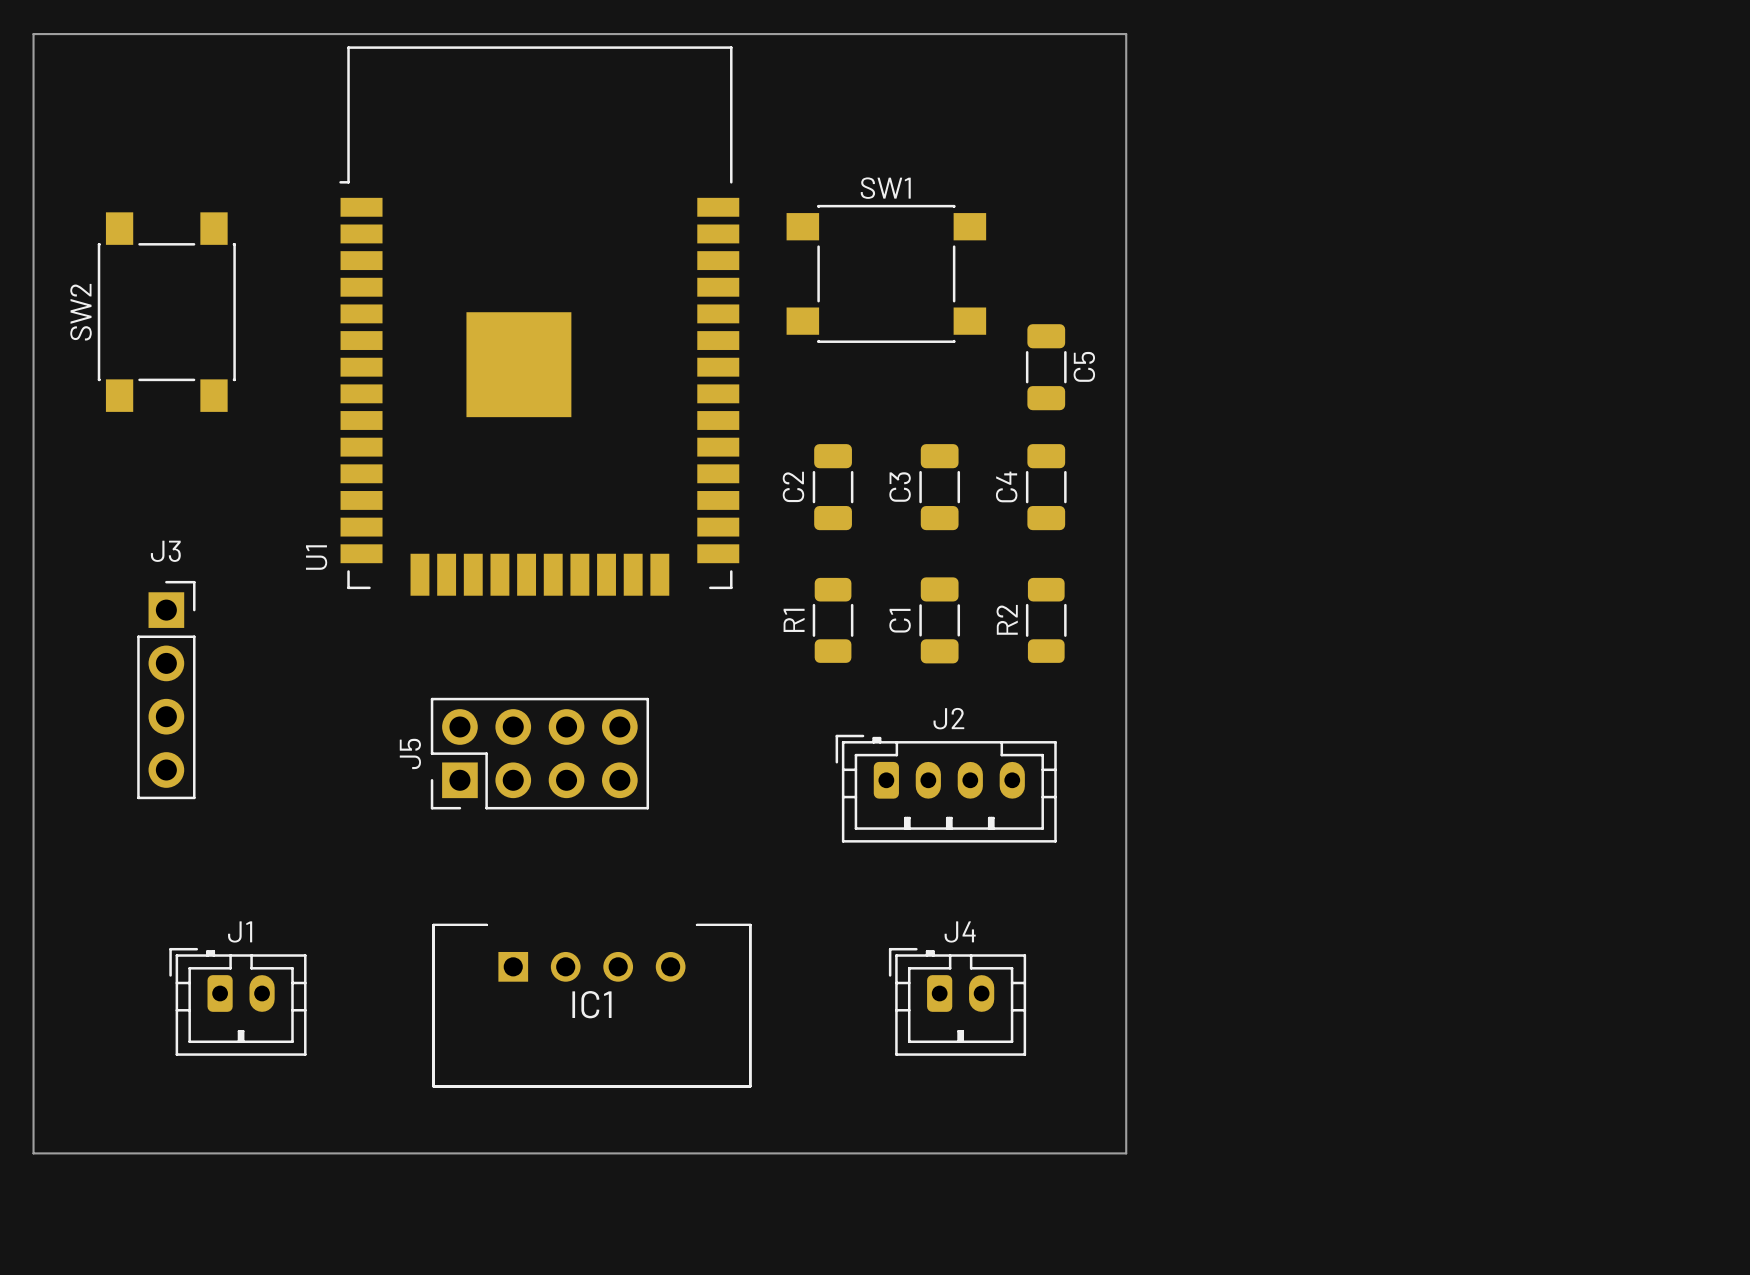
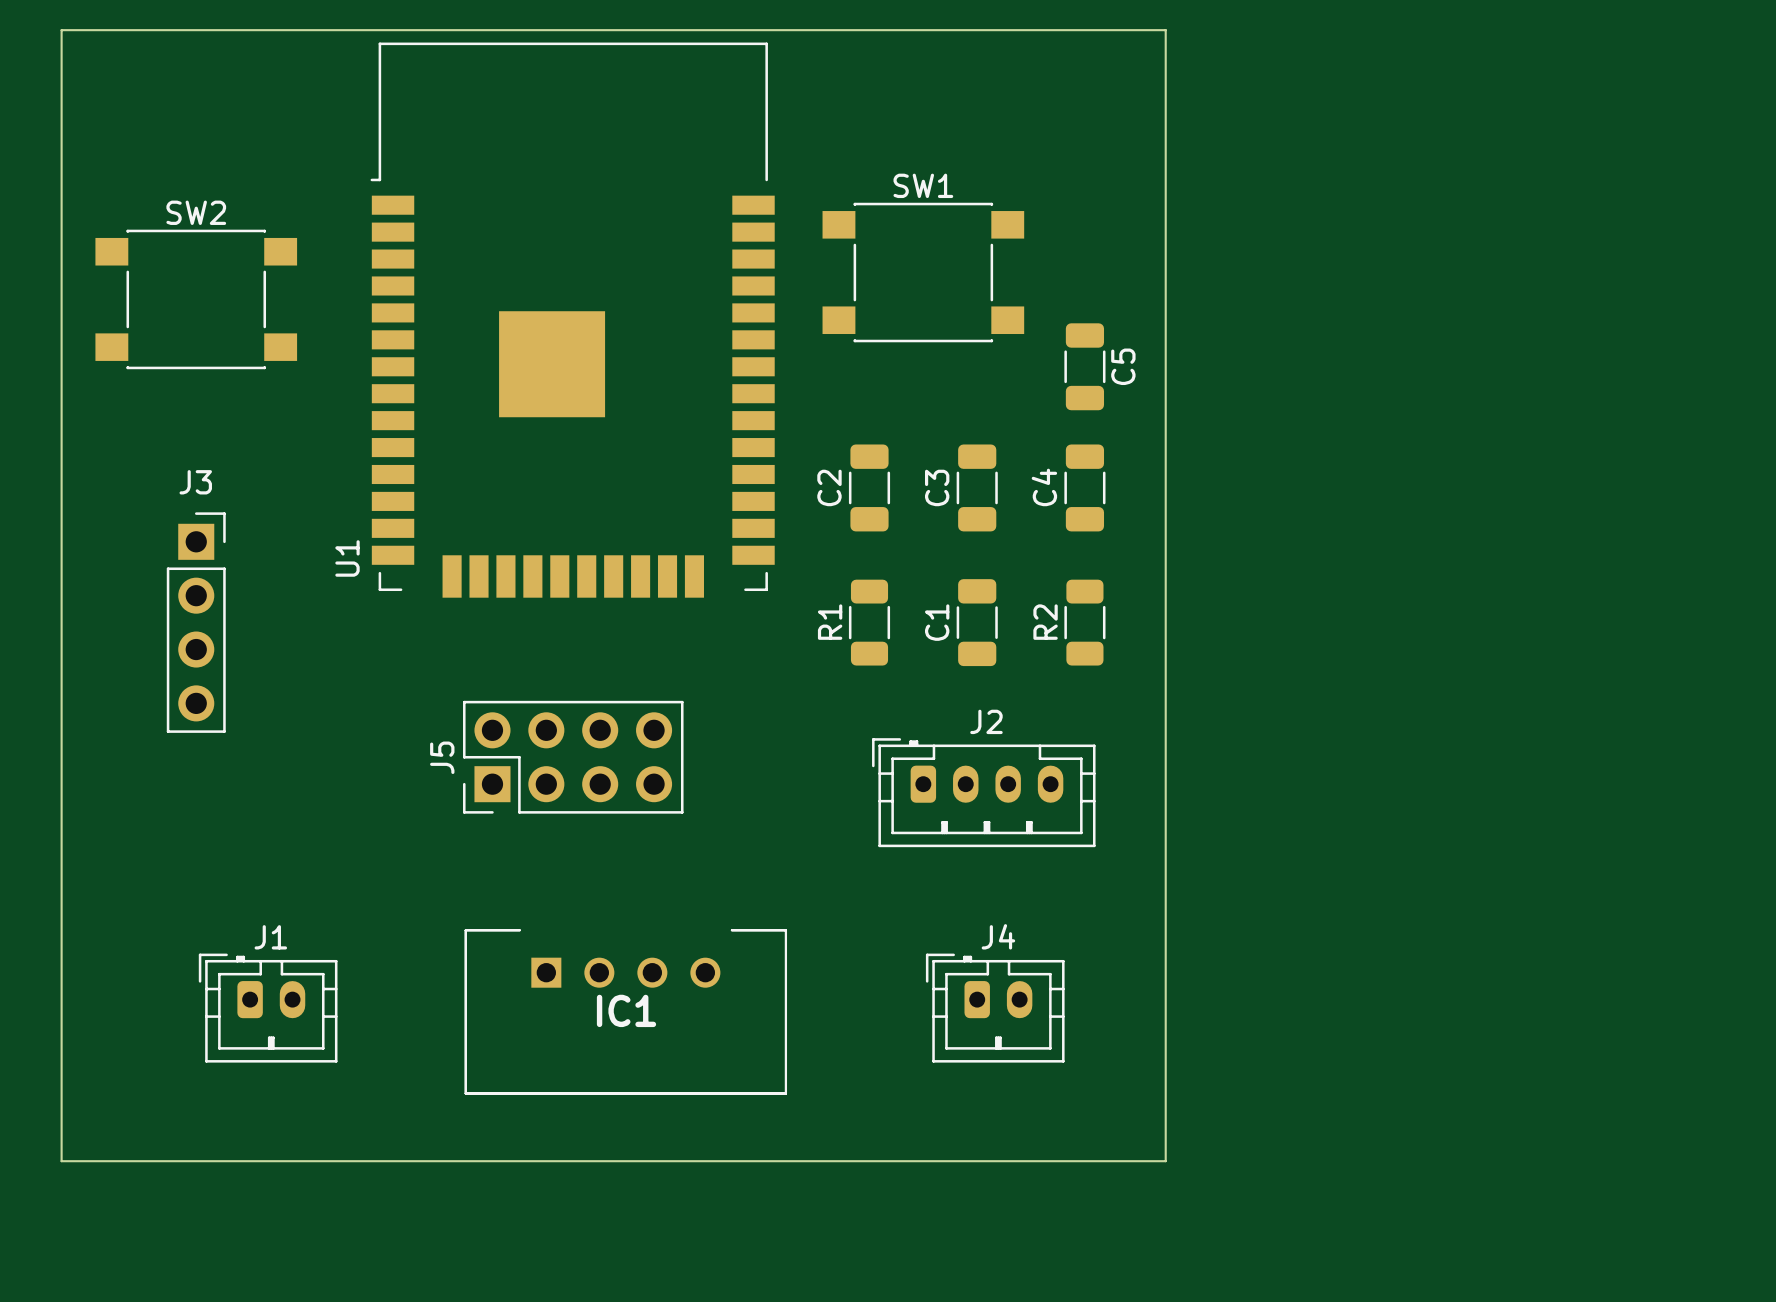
SW2 rotation: 0° (166, 312) -> 90° clockwise (196, 299)
J3 position: (166, 690) -> (196, 622)

